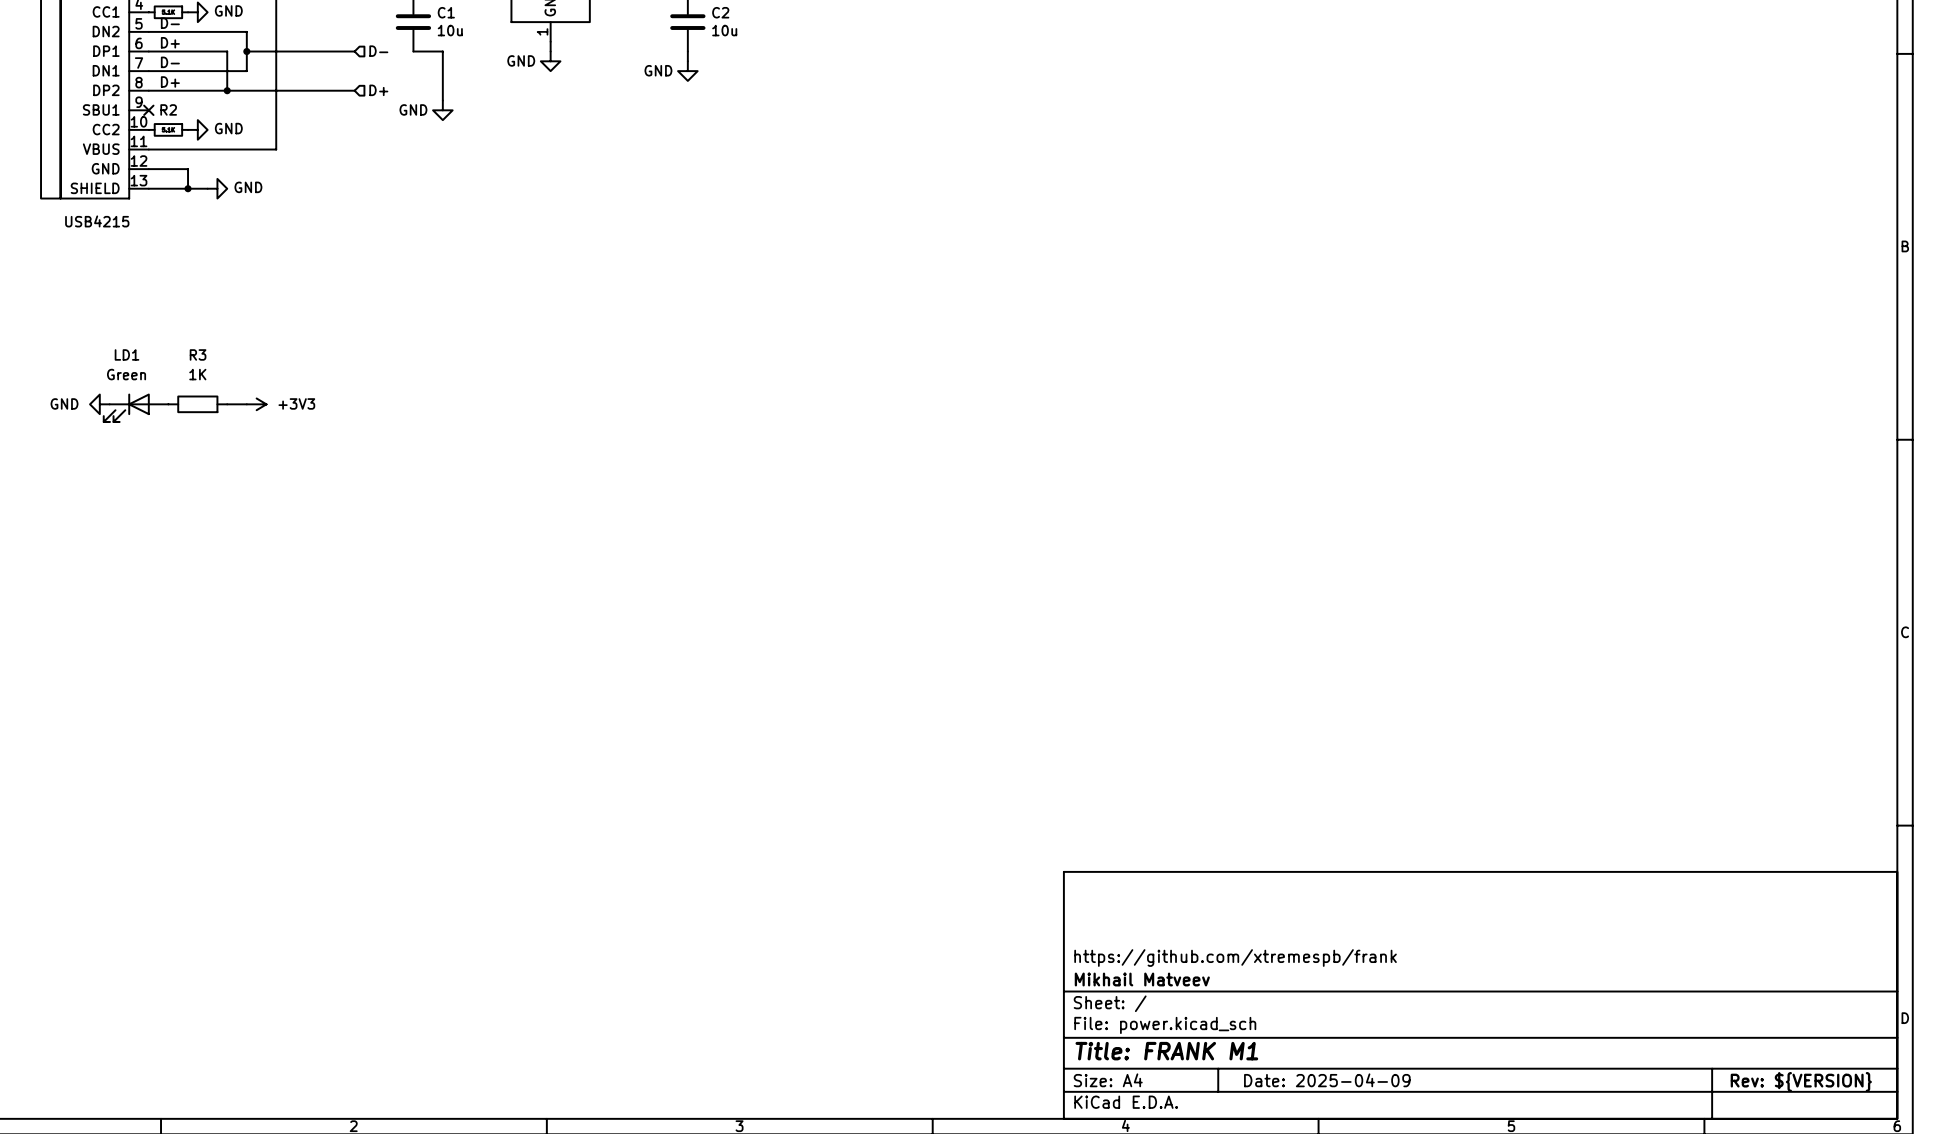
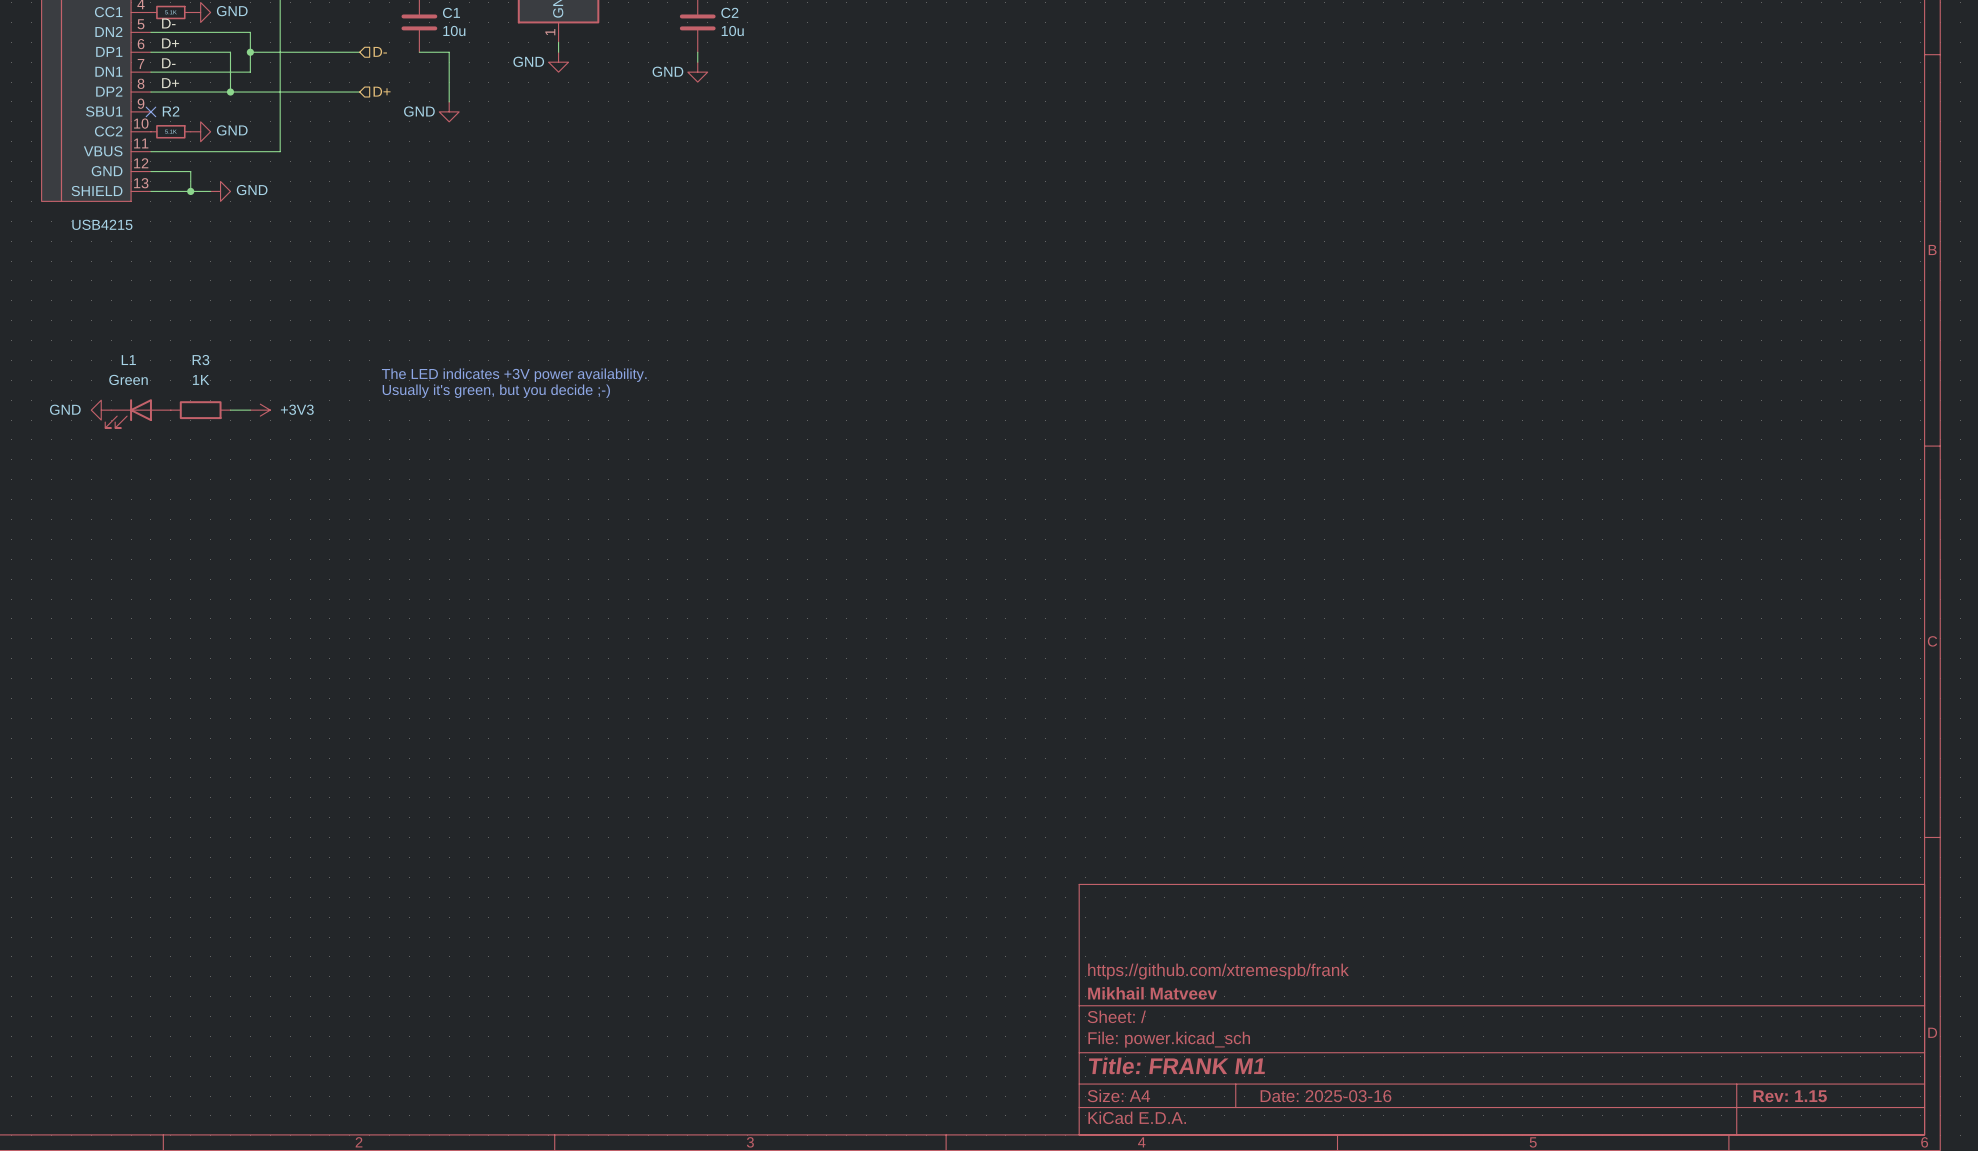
LD1 name: LD1 (127, 354) -> L1 (128, 360)
text: none -> The LED indicates +3V power availability. (514, 375)
text: none -> Usually it's green, but you decide ;-) (496, 391)
title block: Date: 2025-04-09 (1327, 1080) -> Date: 2025-03-16 (1325, 1096)
title block: Rev: ${VERSION} (1801, 1081) -> Rev: 1.15 (1790, 1096)

